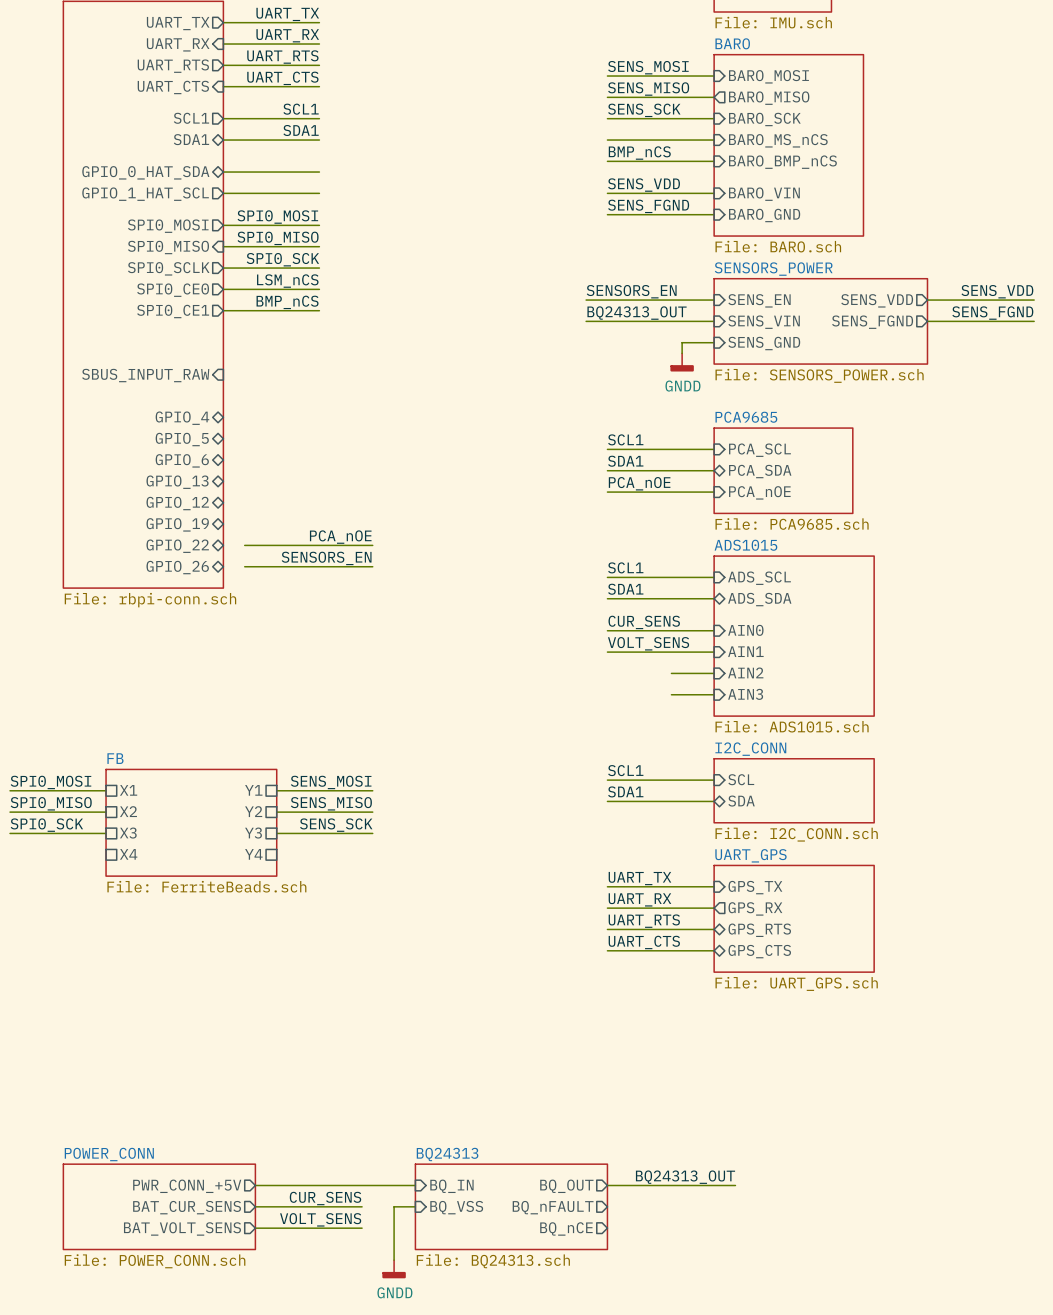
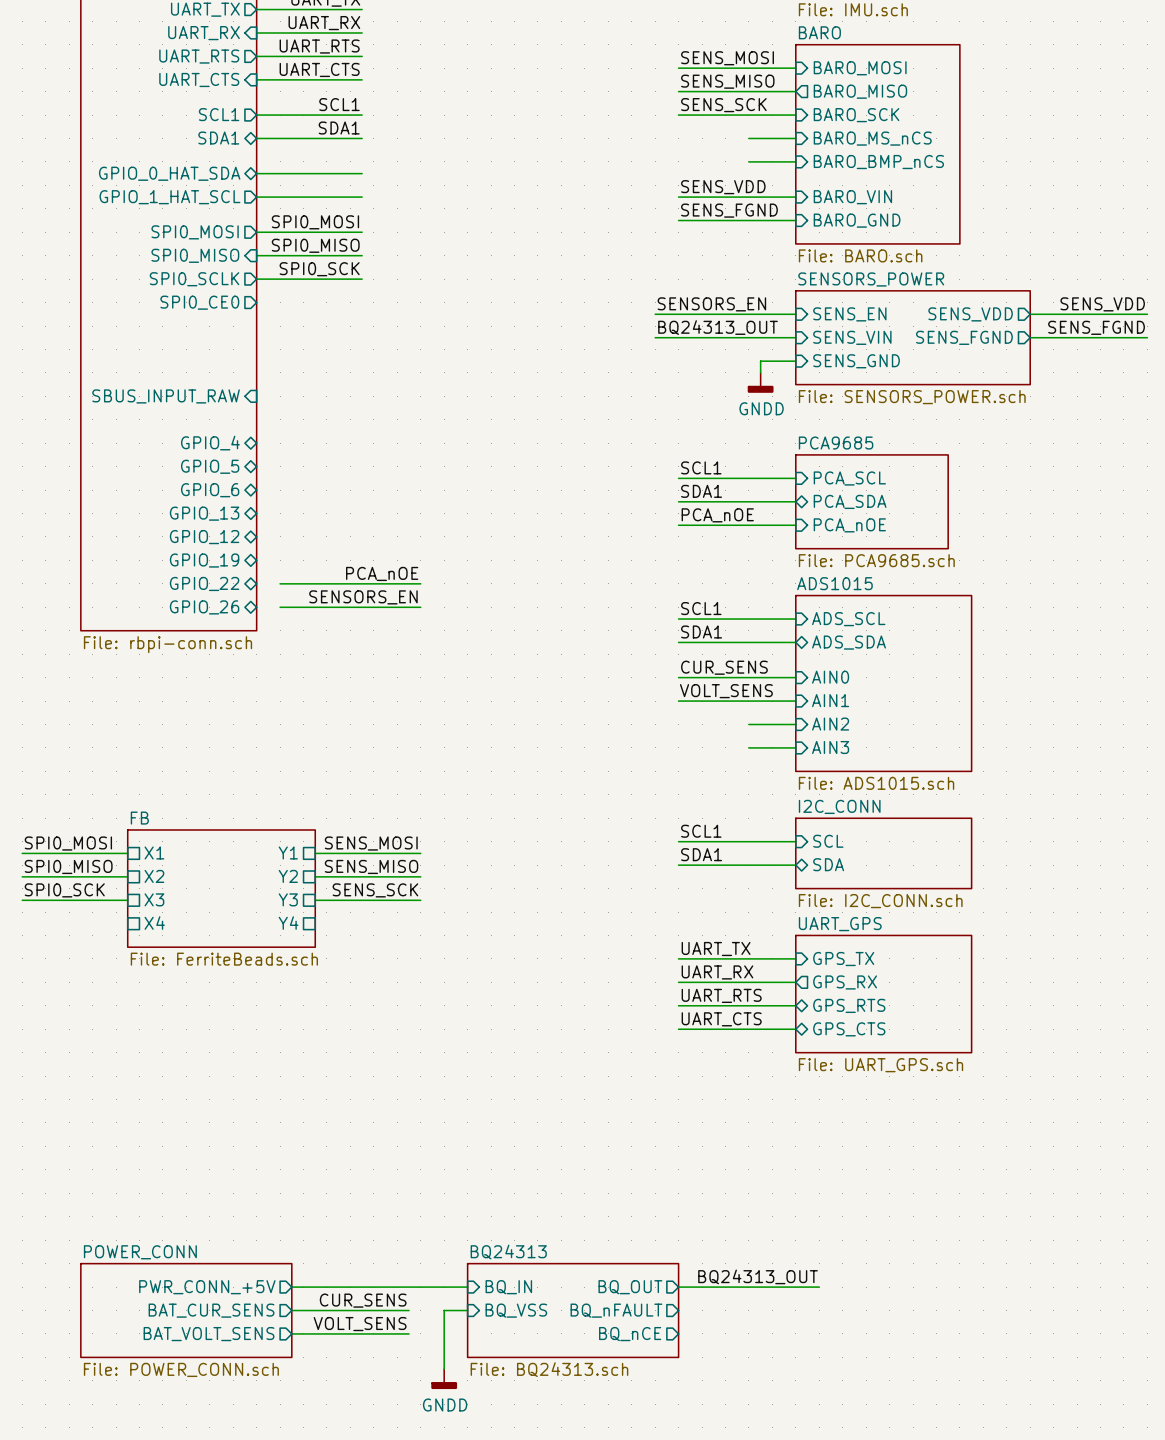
wire: (607, 140) (671, 140) -> none
label: BMP_nCS (639, 153) -> none
wire: (607, 161) (671, 161) -> none
label: LSM_nCS (287, 281) -> none
wire: (223, 289) (319, 289) -> none
label: BMP_nCS (287, 302) -> none
wire: (223, 310) (319, 310) -> none
sheet pin: SPI0_CE1 (173, 311) -> none

